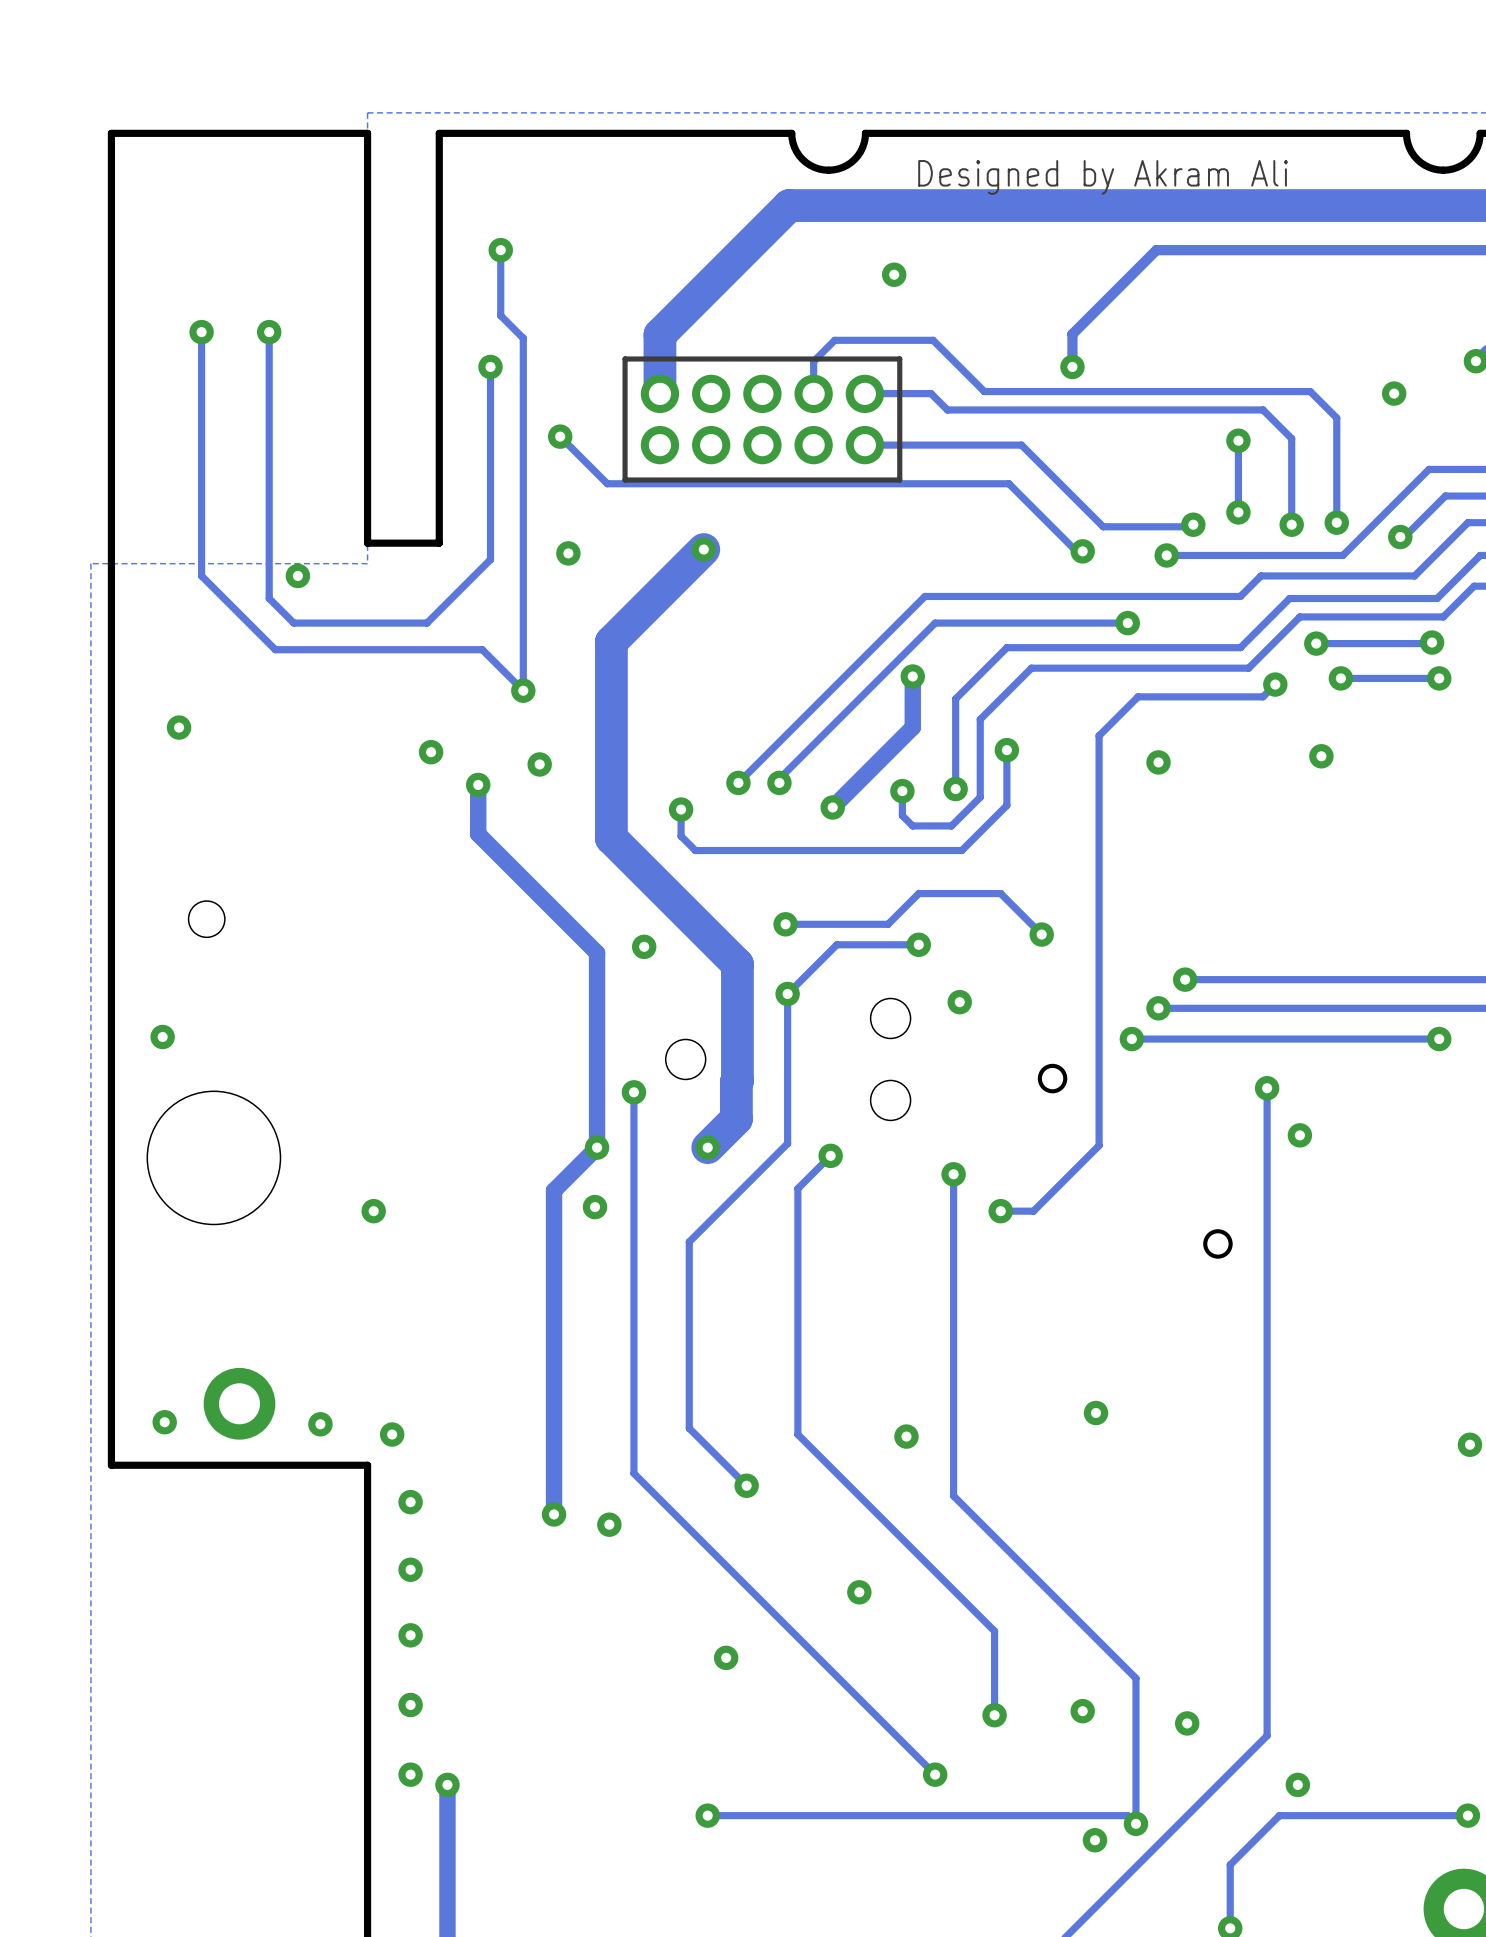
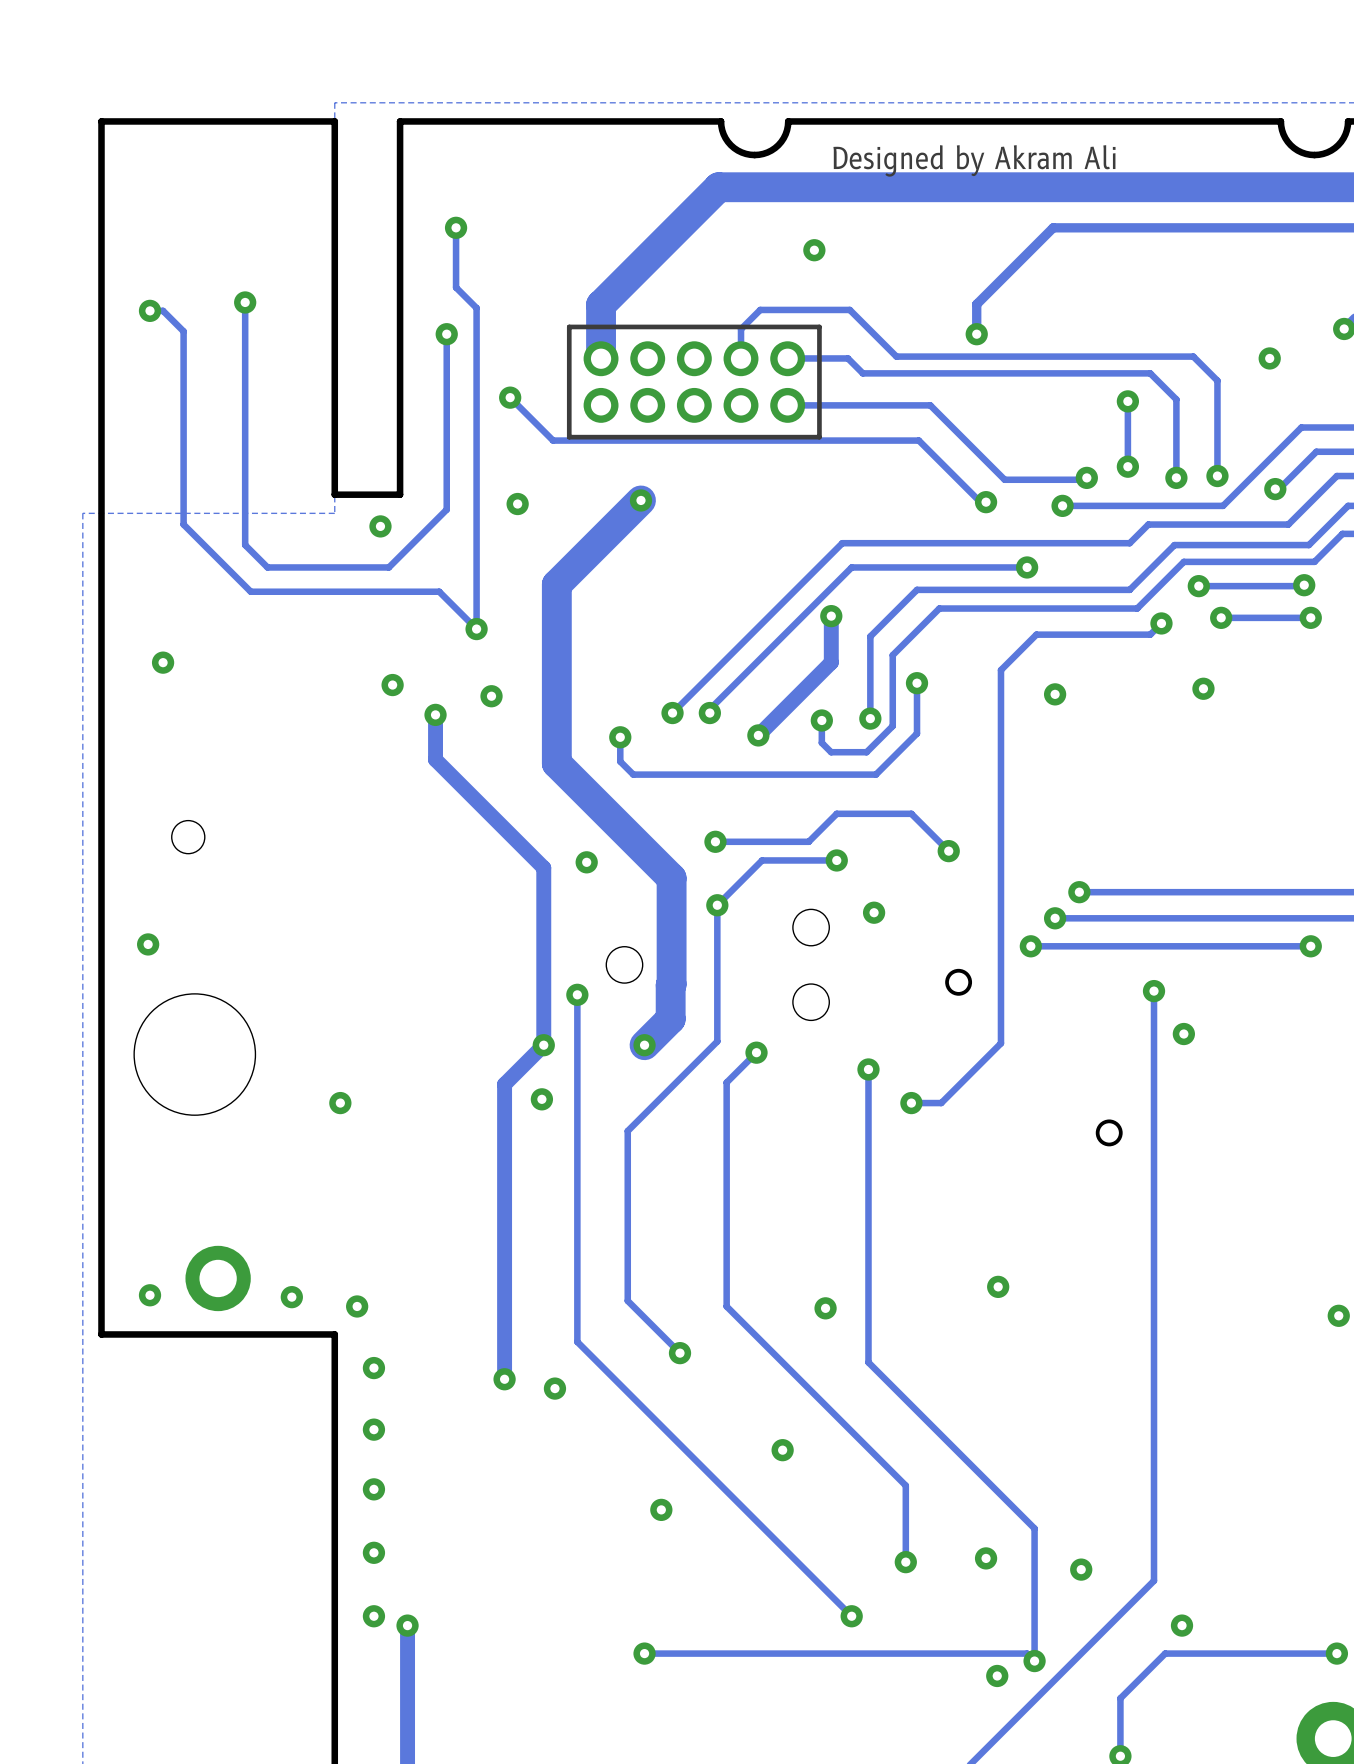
track: (201, 332) (201, 363) -> (150, 310) (163, 310) (183, 331)
via position: (201, 332) -> (150, 310)
via position: (297, 575) -> (380, 526)

